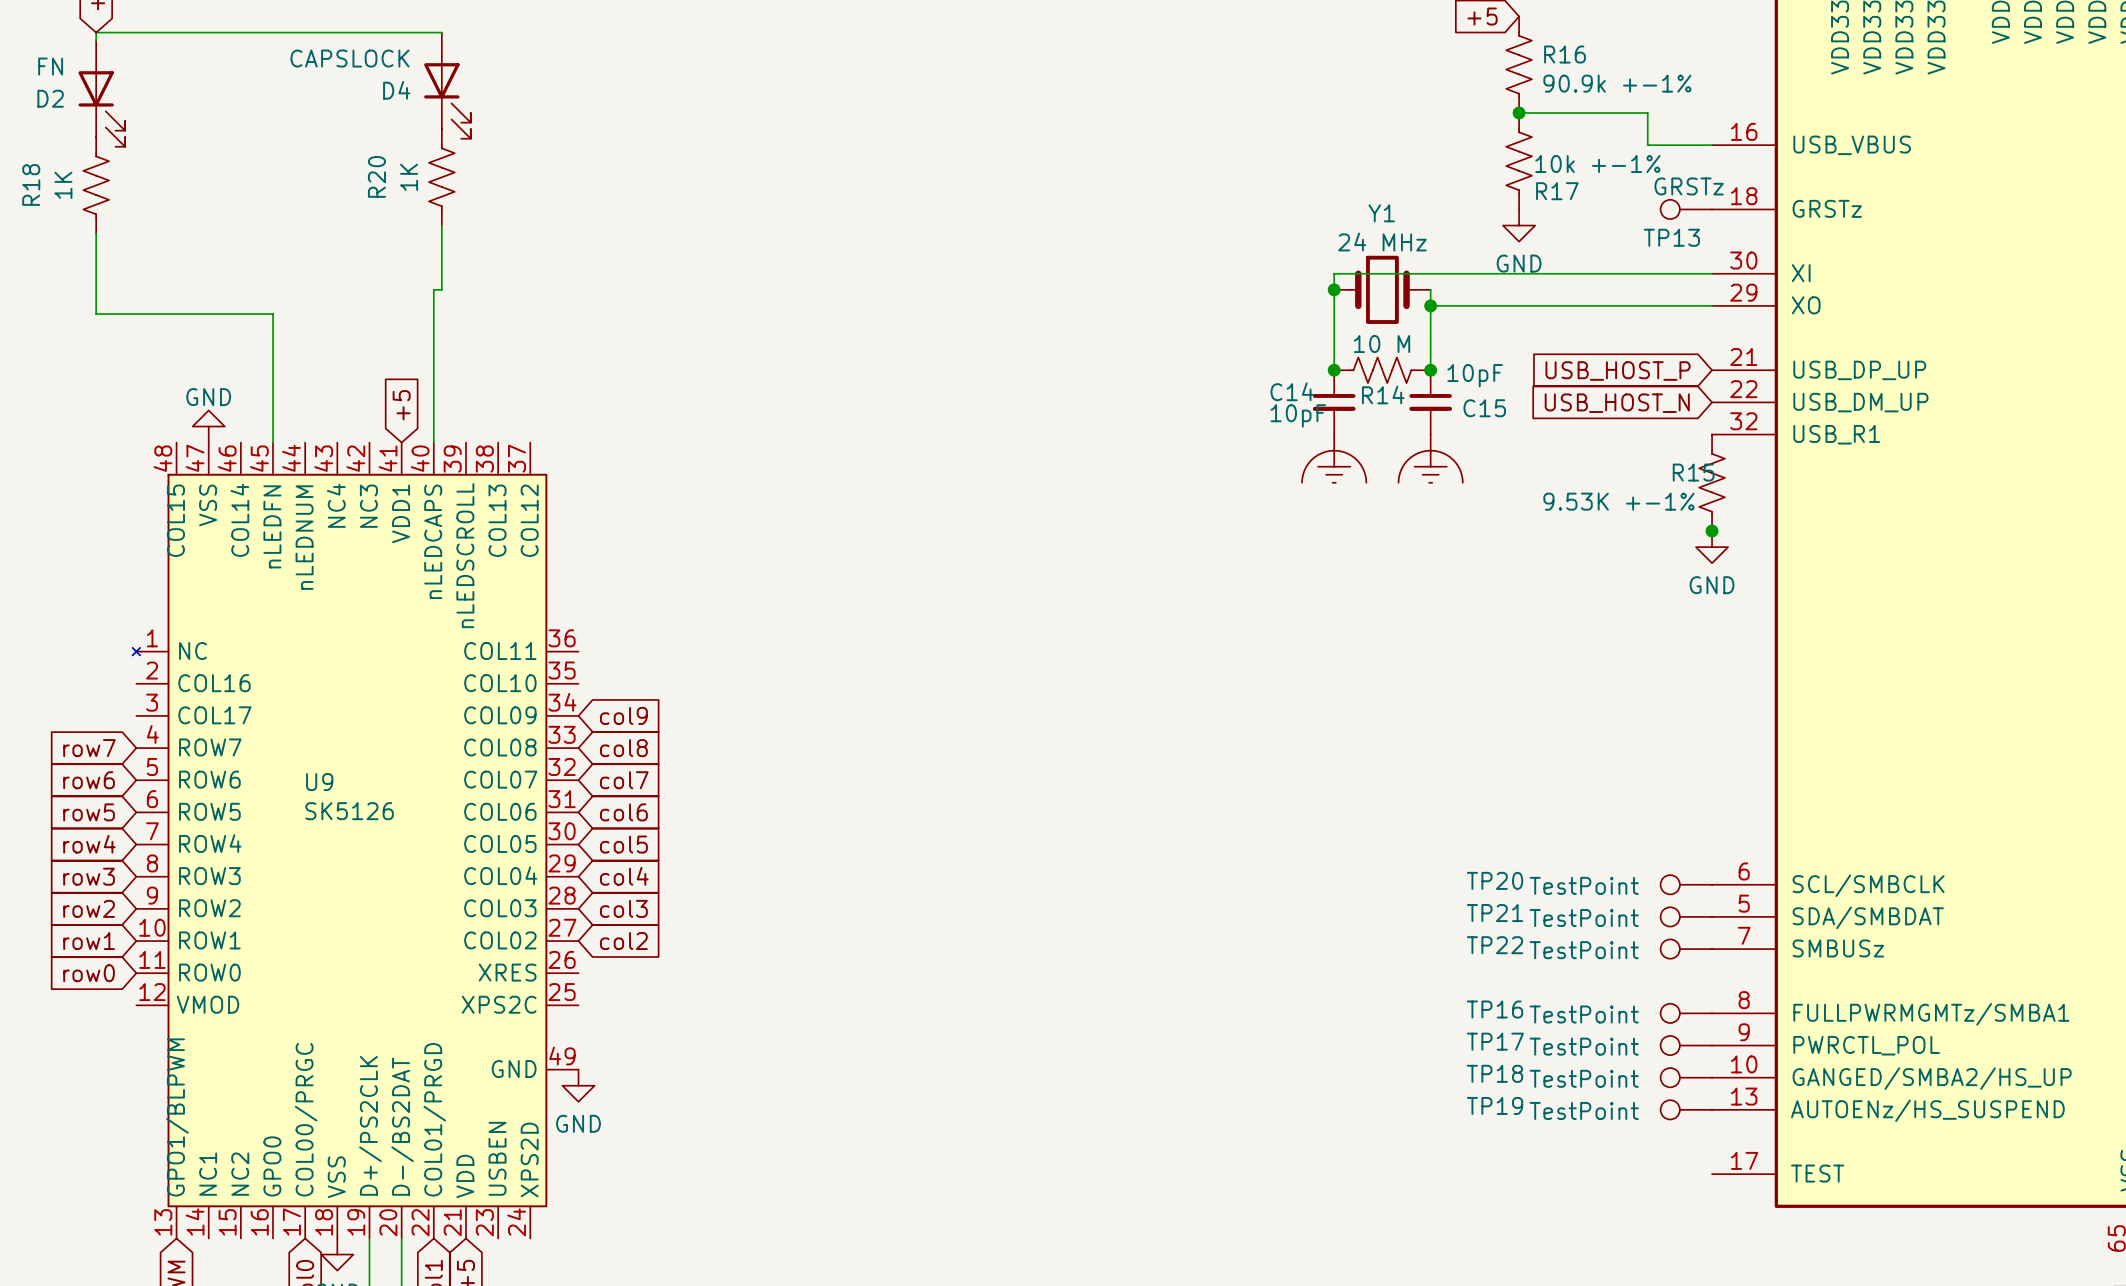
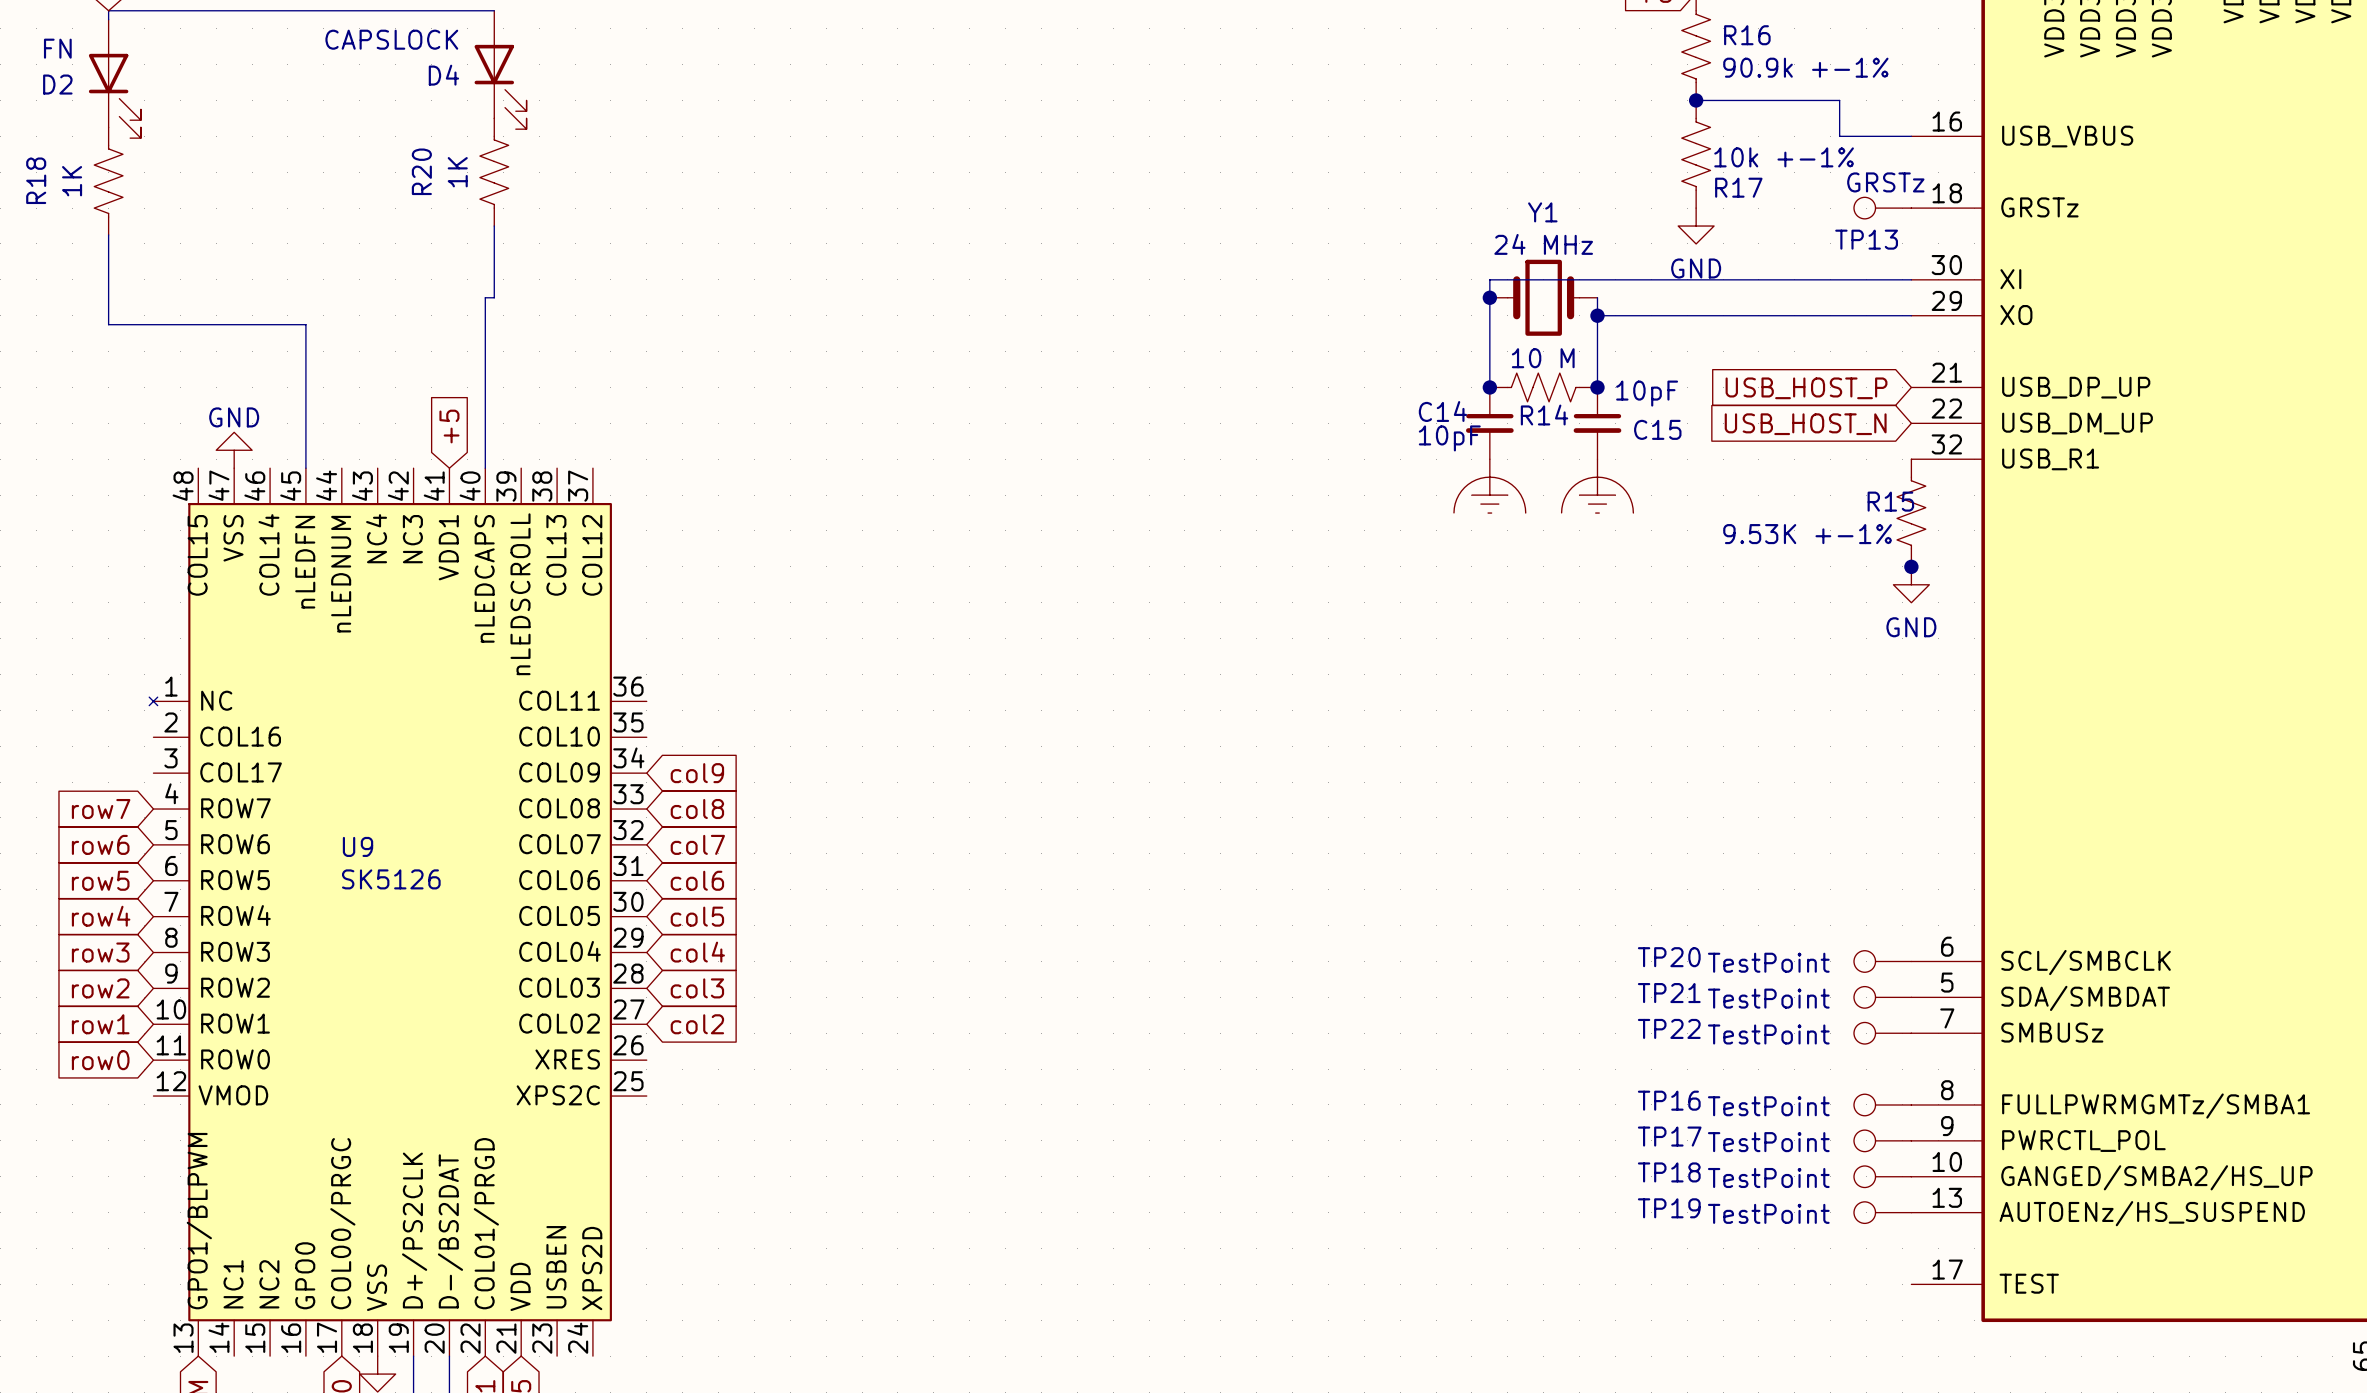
U9 symbol: [132, 442, 579, 1239] -> [149, 468, 647, 1357]
power symbol: GND (578, 1085) -> none

